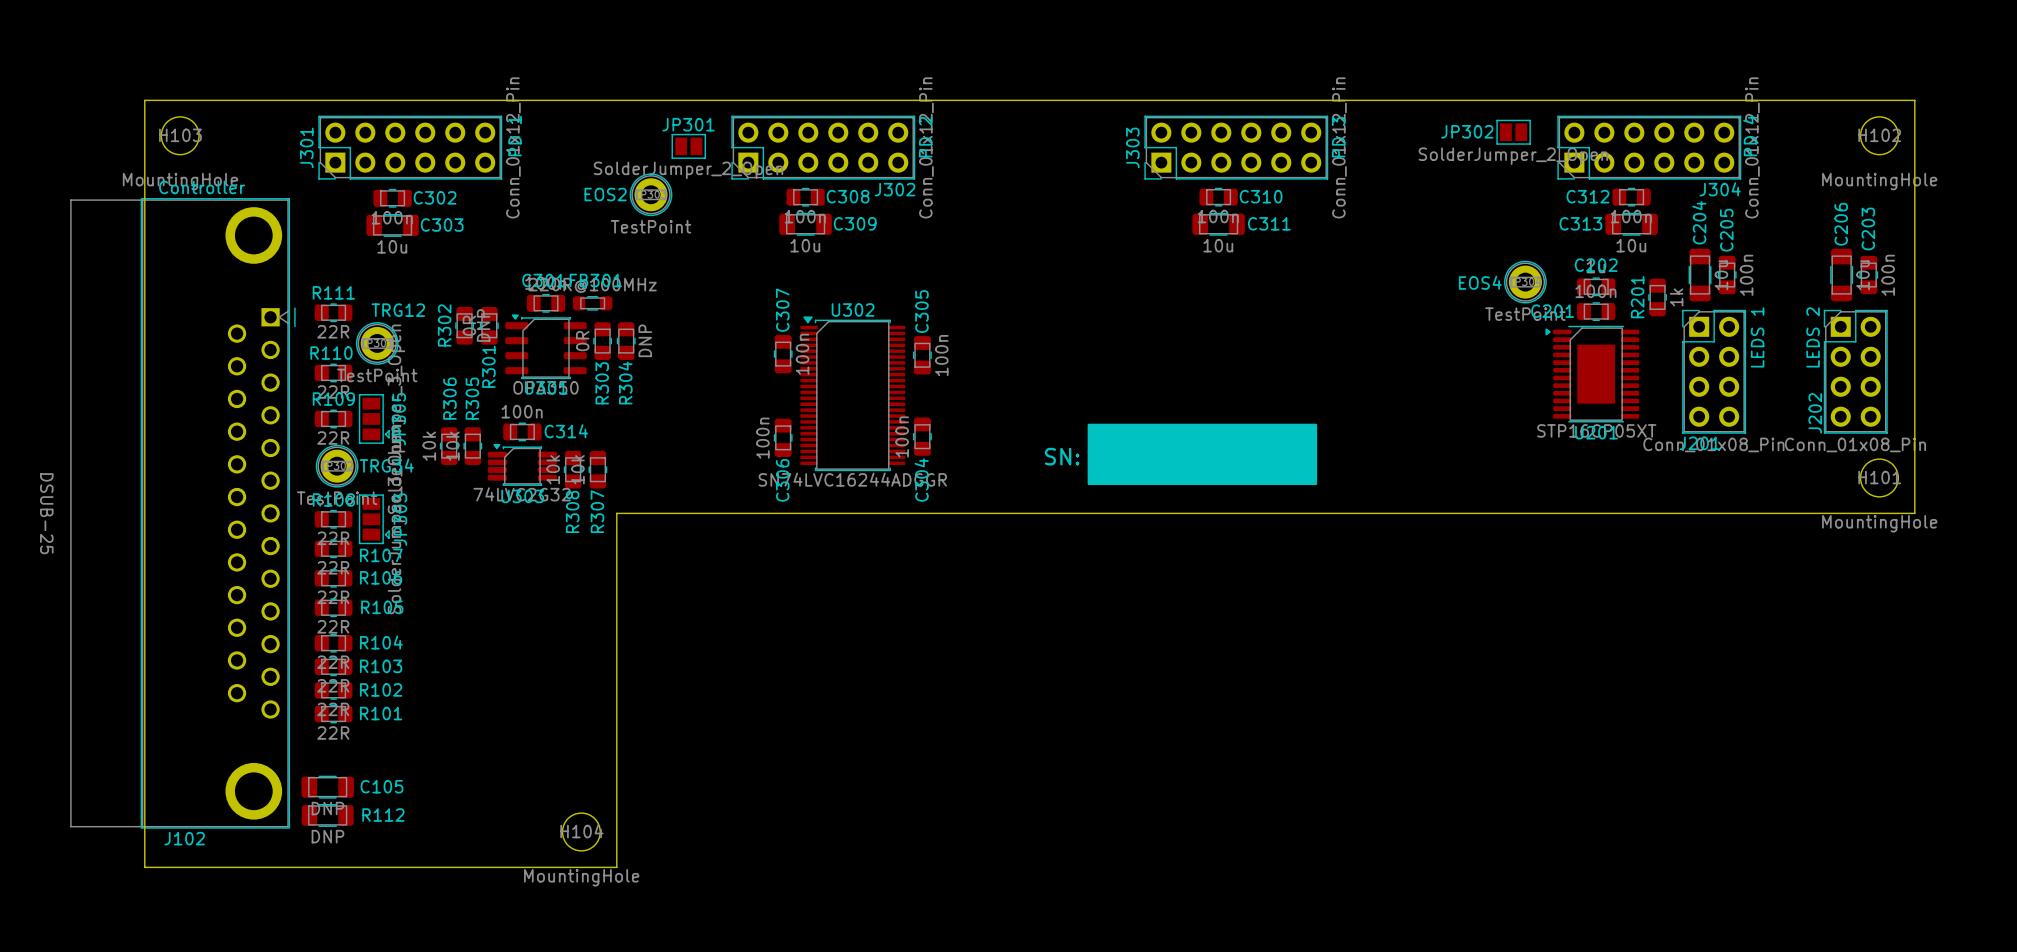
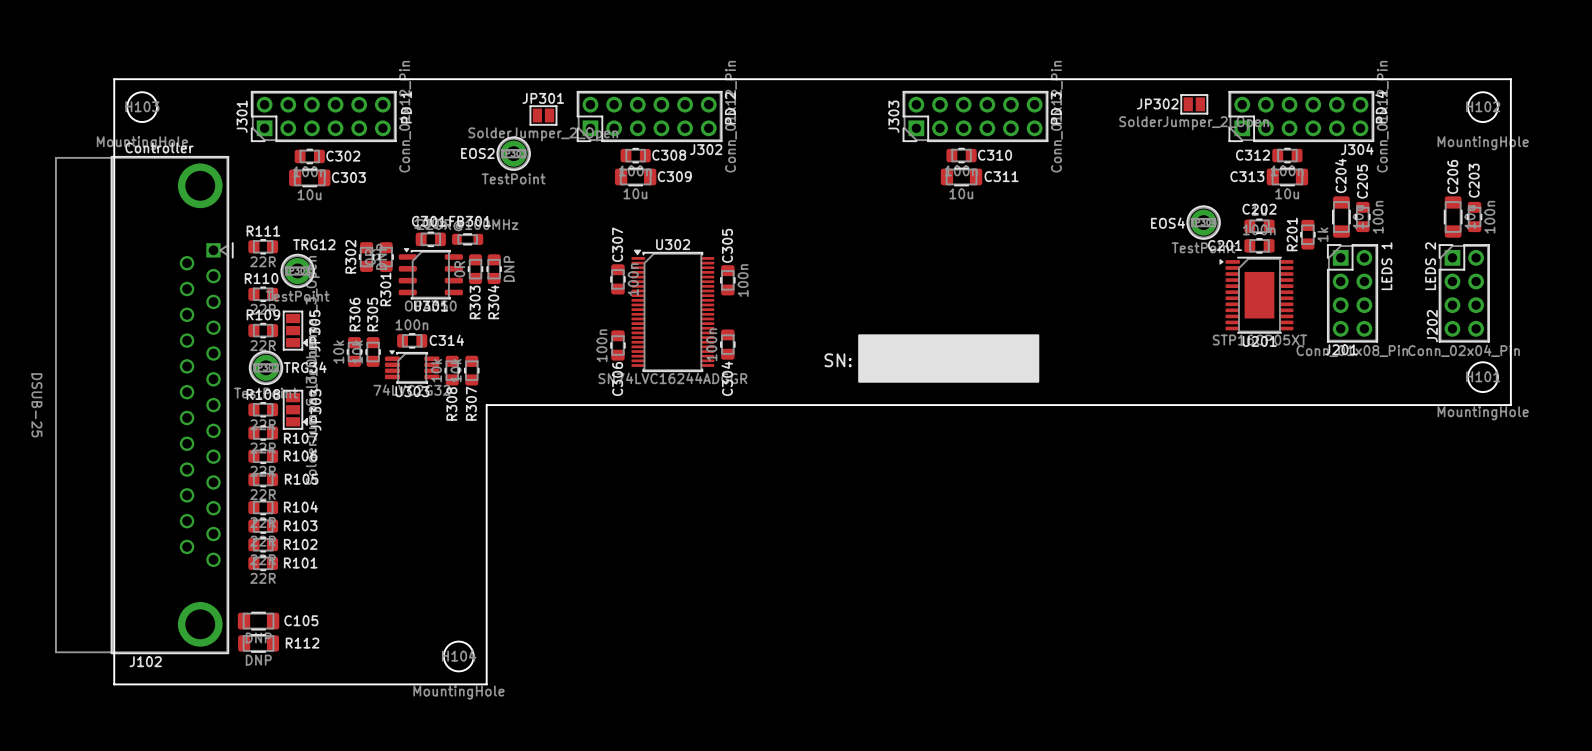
J202 value: Conn_01x08_Pin (1855, 444) -> Conn_02x04_Pin (1464, 350)

